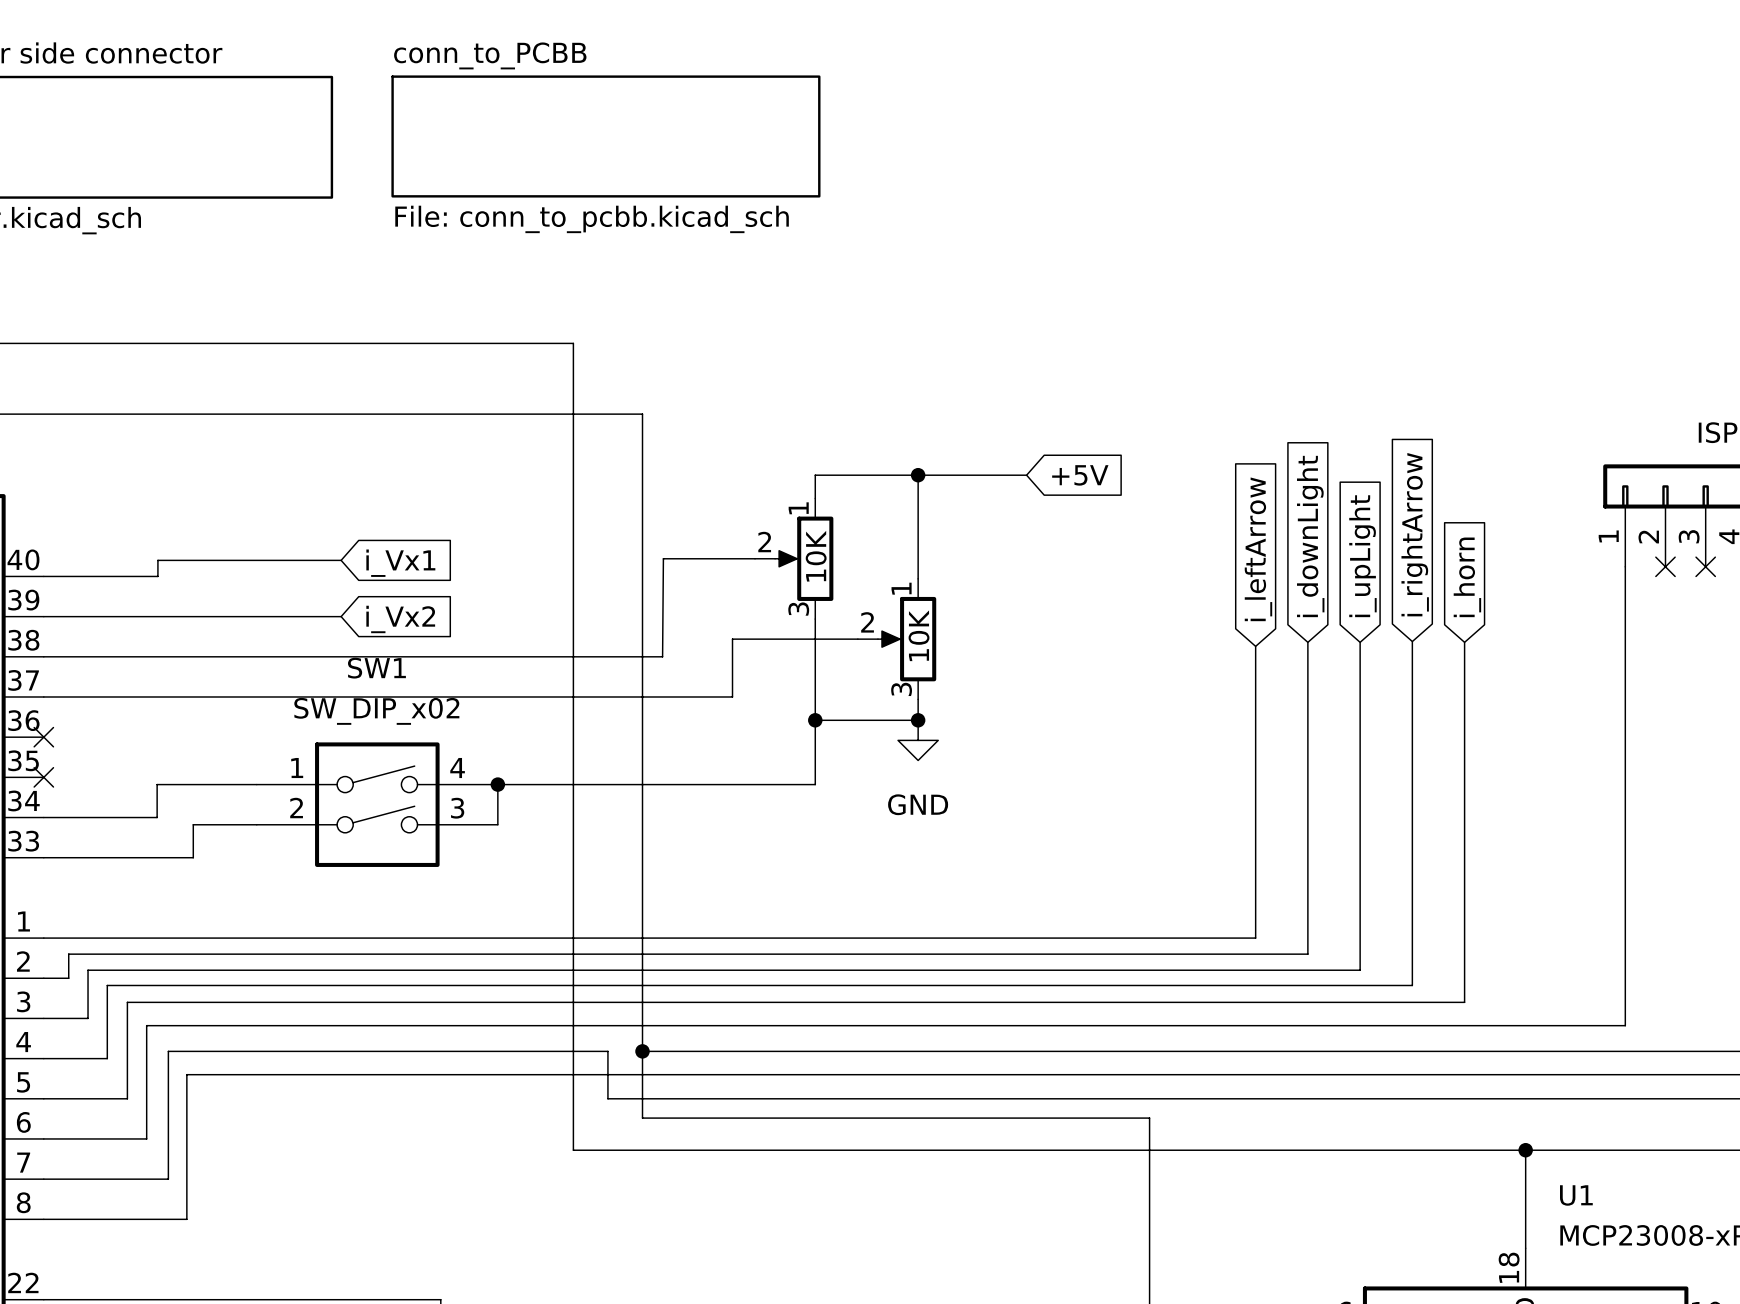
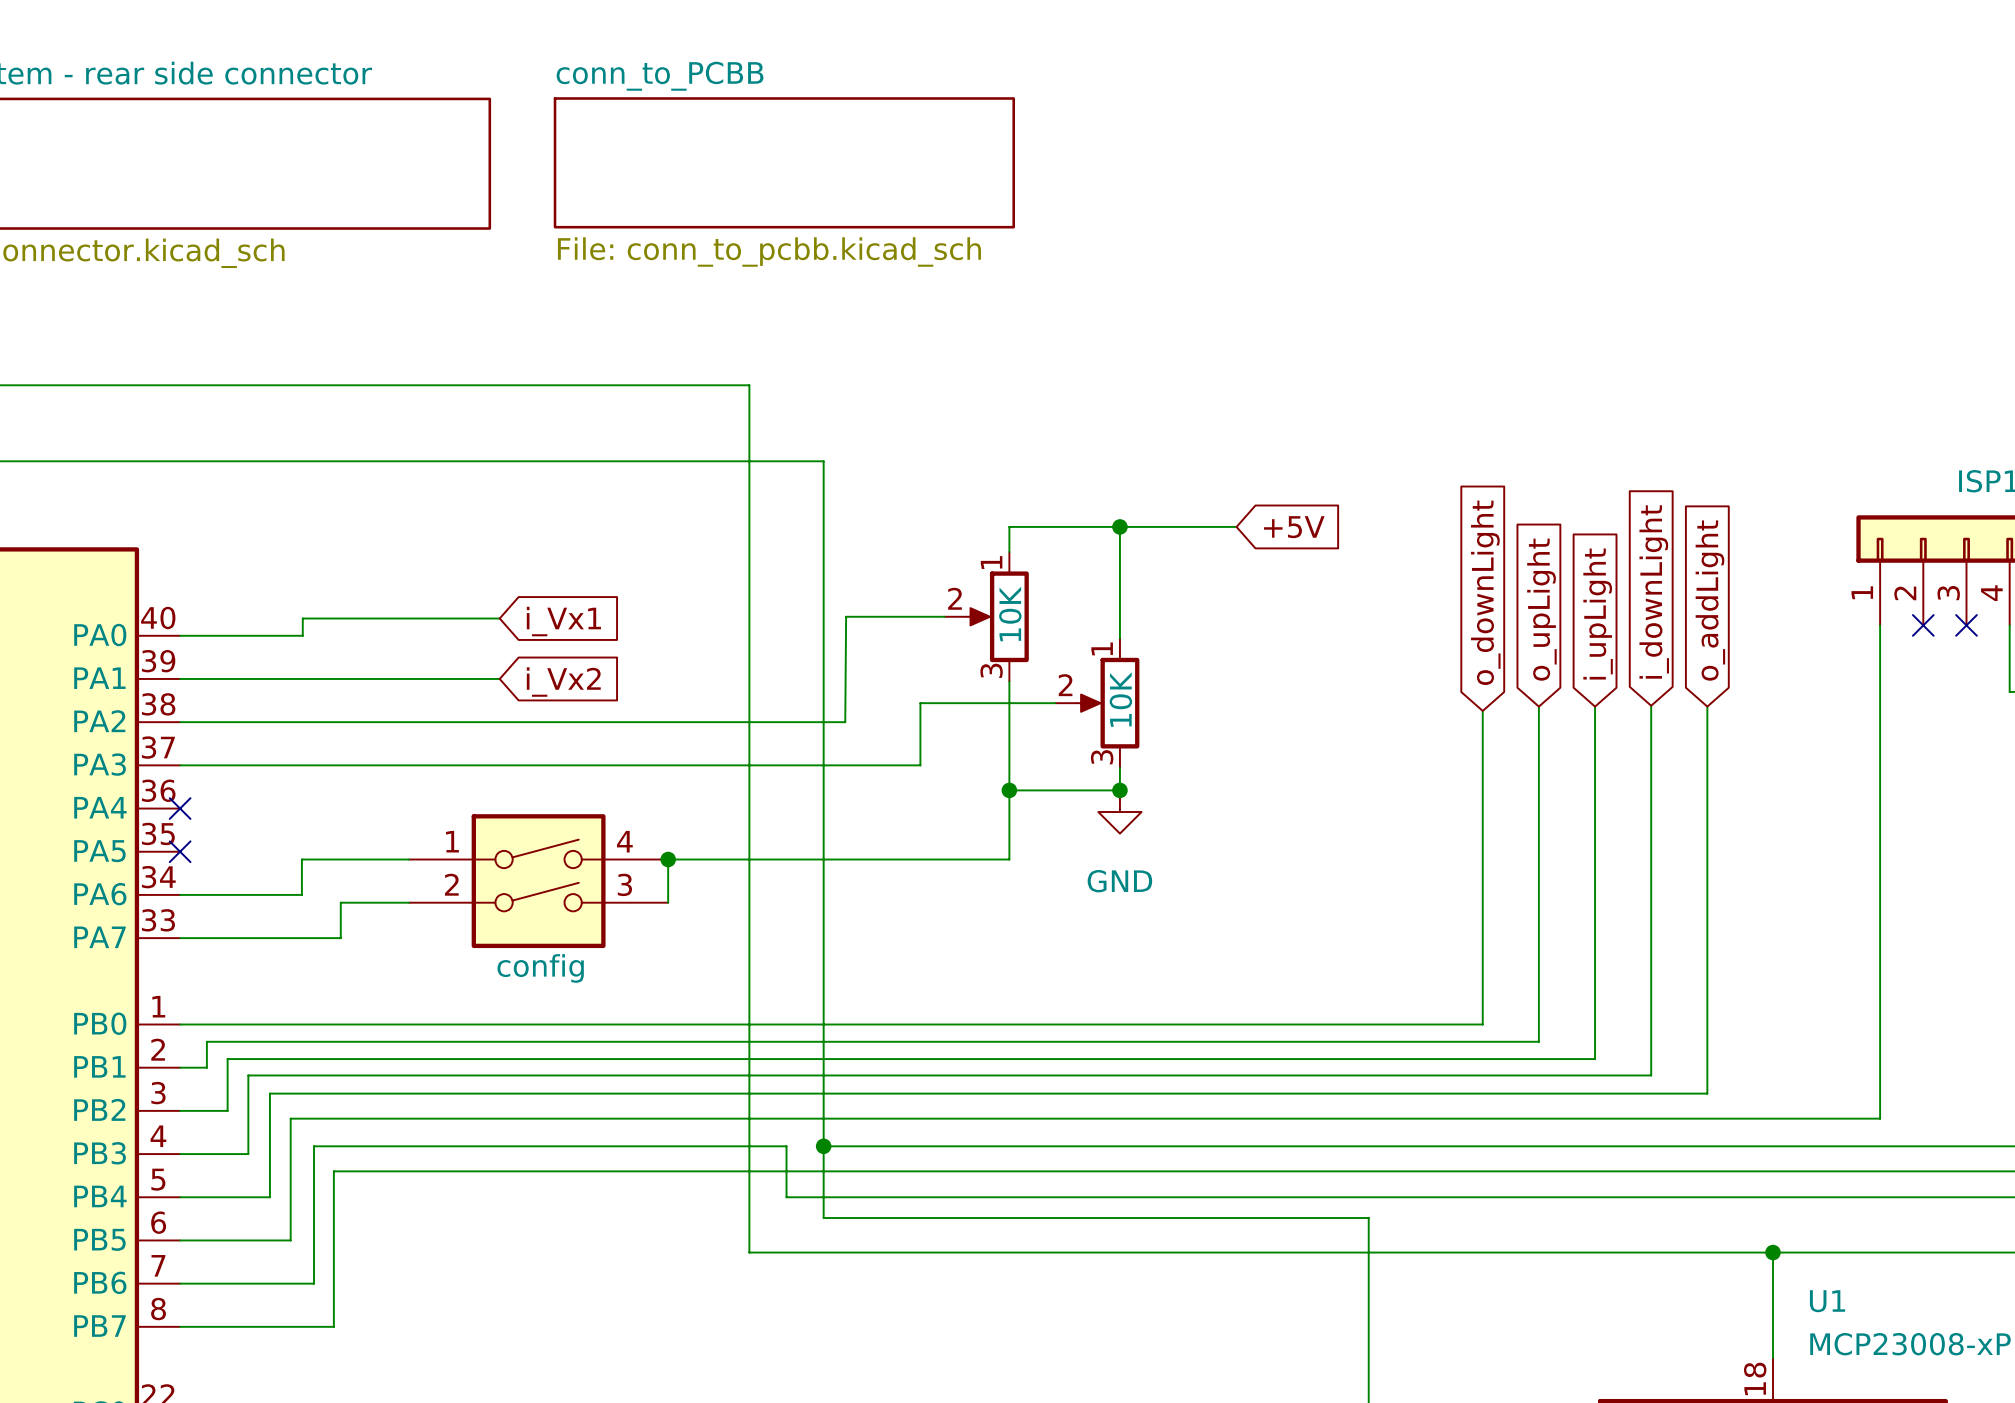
global label: i_rightArrow (1415, 534) -> i_downLight (1654, 591)
global label: i_downLight (1310, 536) -> o_upLight (1541, 609)
global label: i_leftArrow (1258, 549) -> o_downLight (1485, 592)
global label: i_horn (1467, 577) -> o_addLight (1710, 600)
SW1 name: SW1 (376, 668) -> none
SW1 value: SW_DIP_x02 (376, 711) -> config (540, 968)

